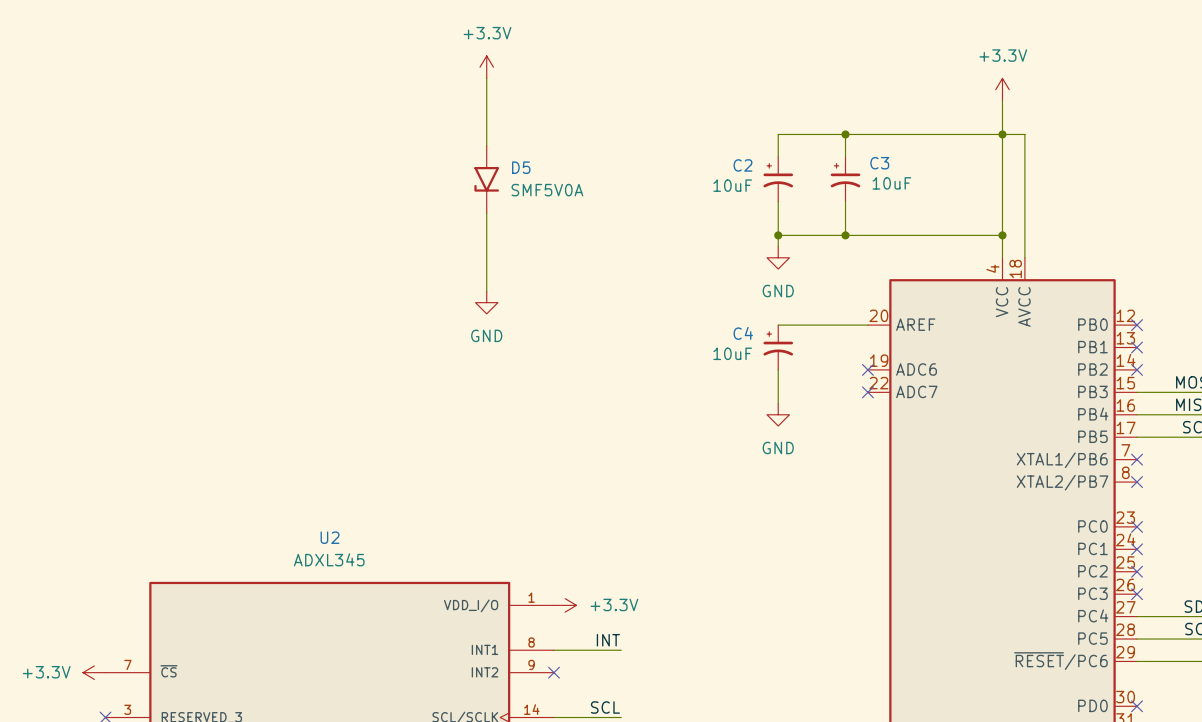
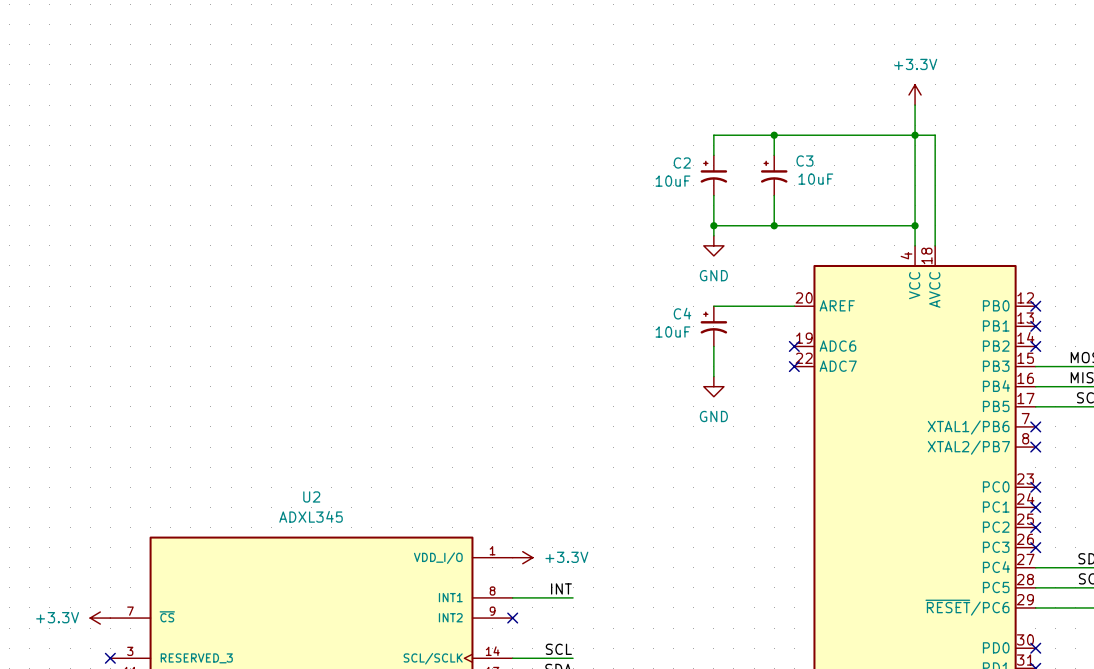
power symbol: +3.3V (486, 67) -> none
wire: (486, 78) (486, 145) -> none
D5: SMF5V0A (486, 179) -> none
wire: (486, 212) (486, 291) -> none
power symbol: GND (486, 302) -> none

